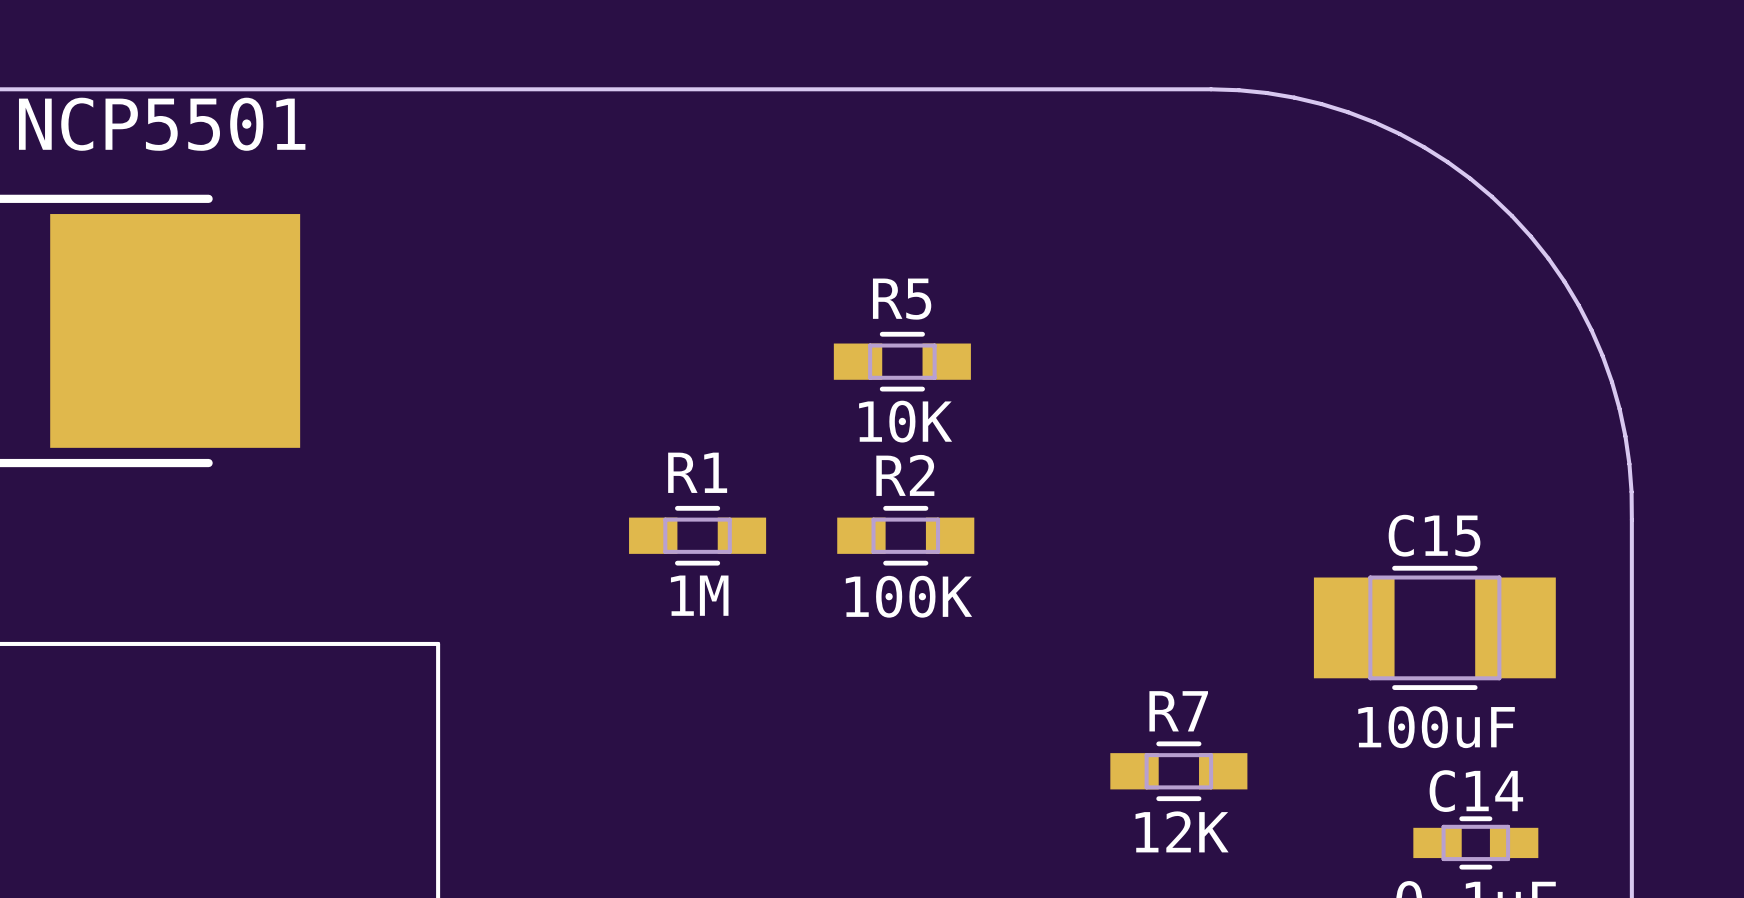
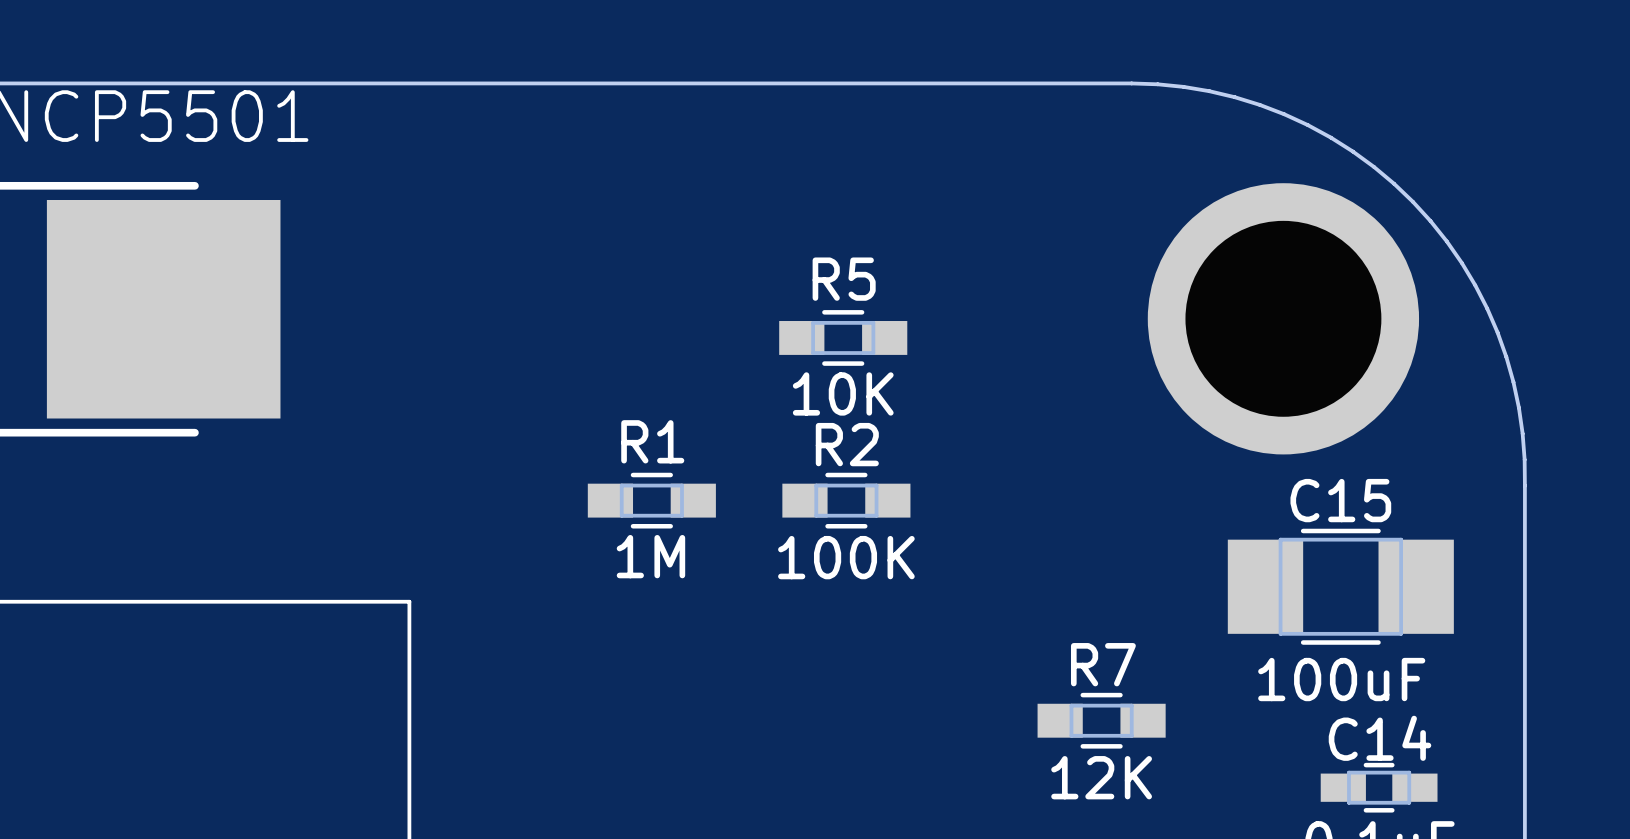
part: none -> (1283, 318)

